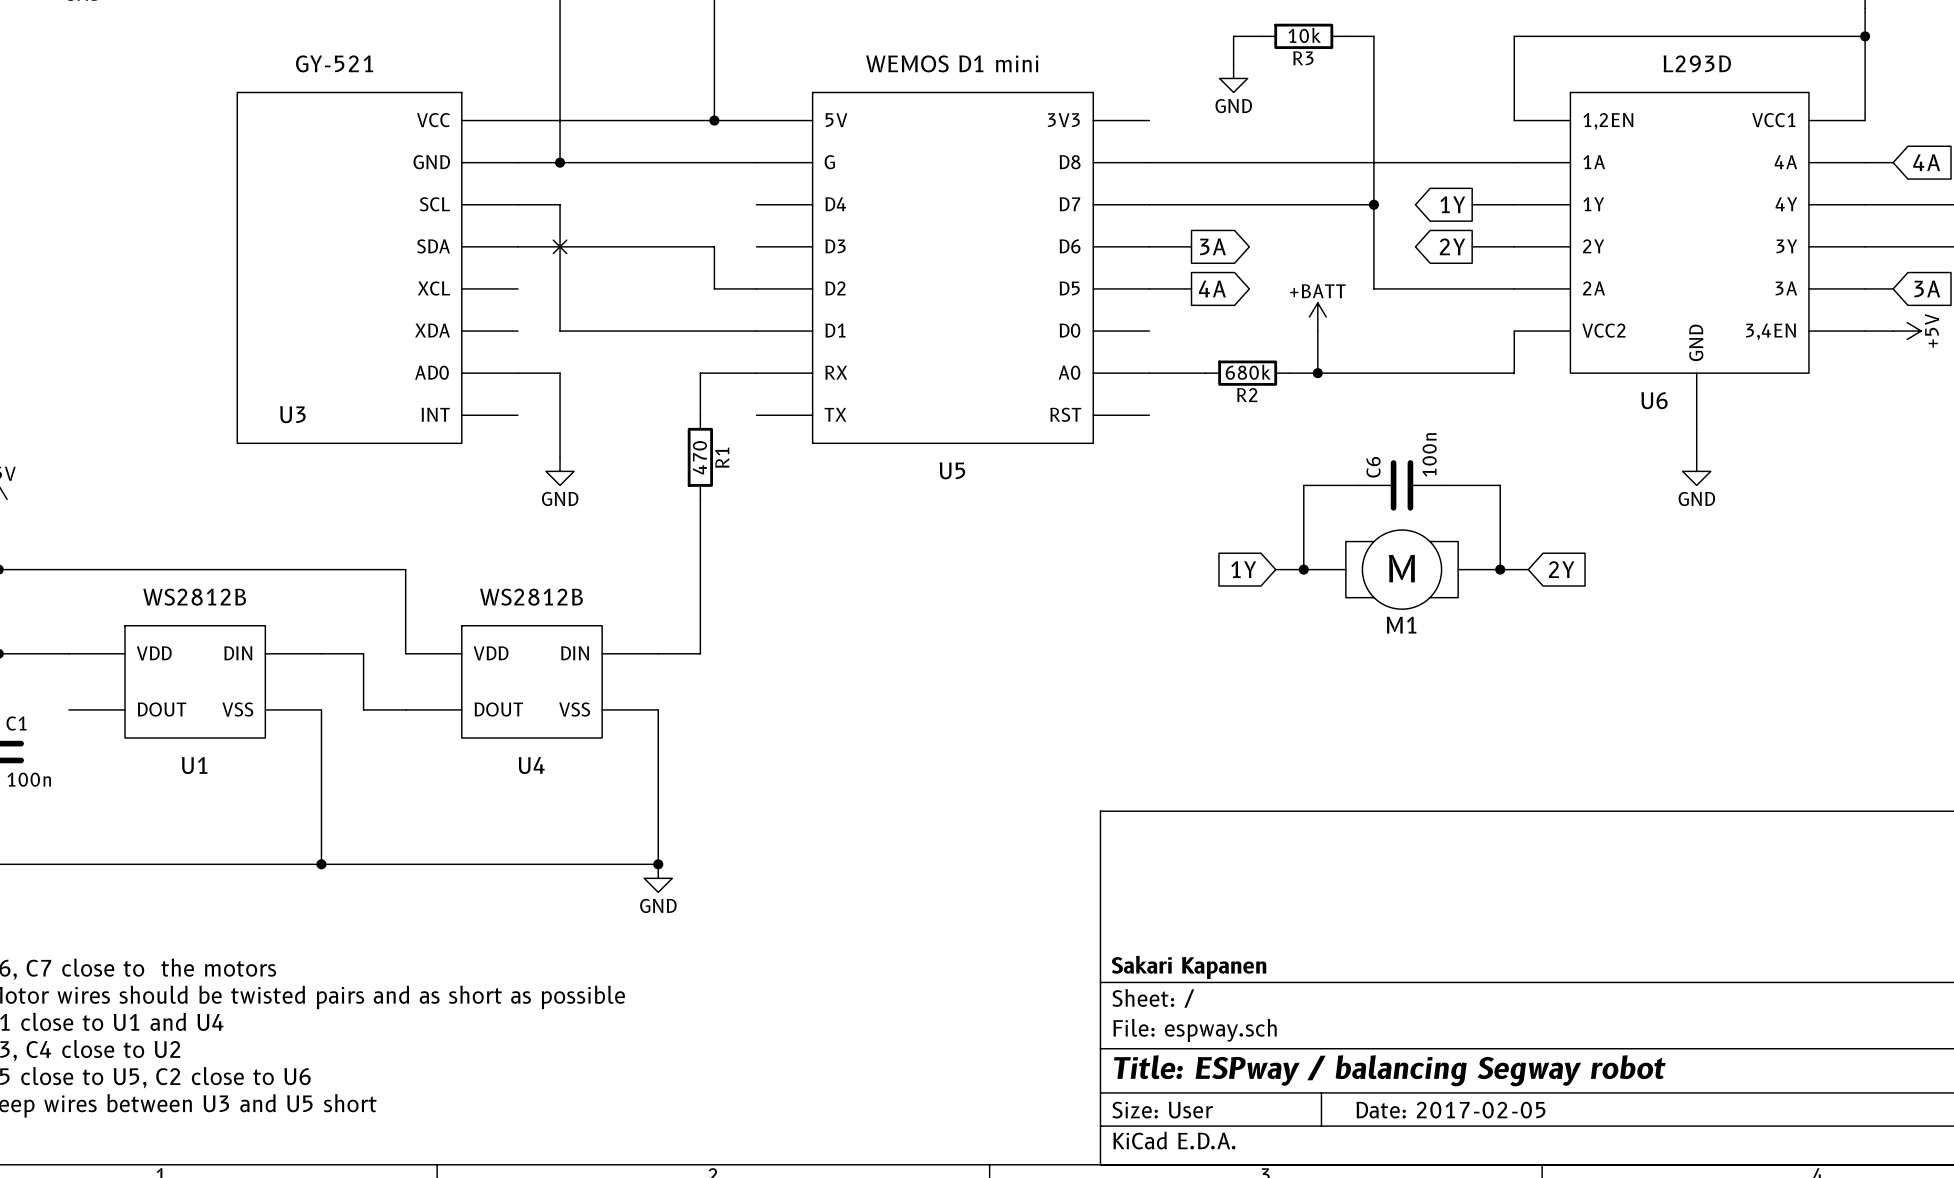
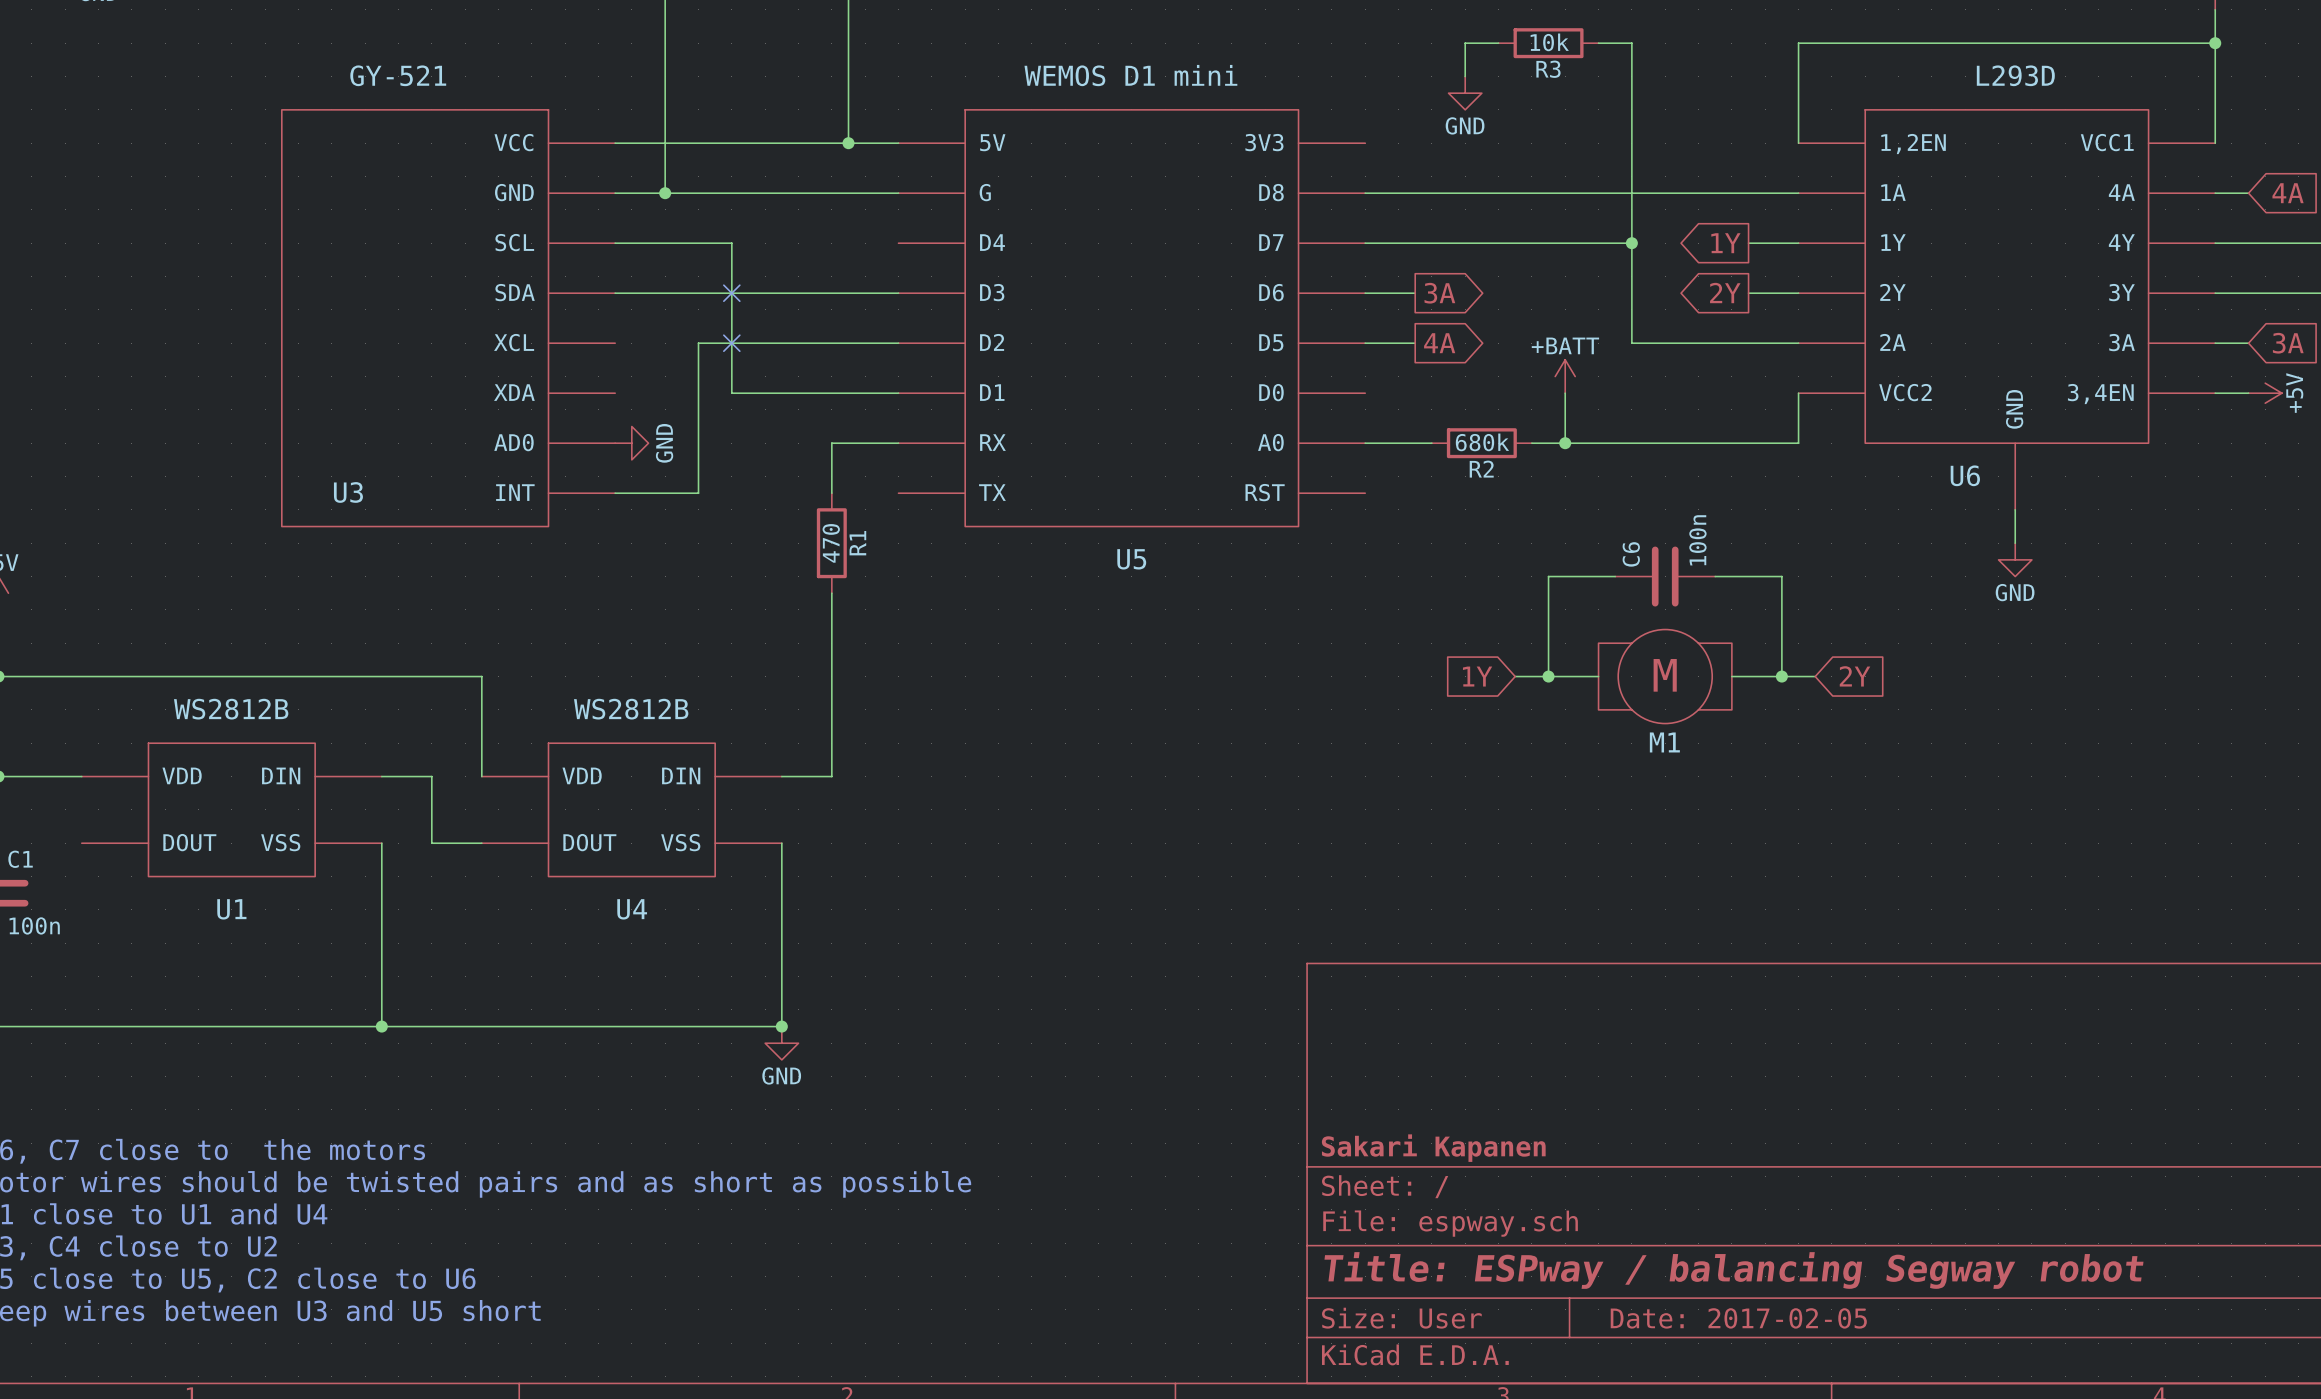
wire: (560, 204) (560, 331) (616, 331) -> (665, 243) (731, 243) (731, 393)
no-connect mark: (560, 246) -> none
no-connect mark: none -> (731, 293)
wire: (714, 246) (714, 288) -> (848, 293) (898, 293)
no-connect mark: none -> (731, 343)
wire: none -> (848, 343) (698, 343) (698, 493) (615, 493)
wire: (517, 373) (560, 373) (560, 457) -> none
power symbol rotation: 0° (560, 471) -> 90° counterclockwise (631, 443)
power symbol position: GND (560, 471) -> GND (631, 443)

